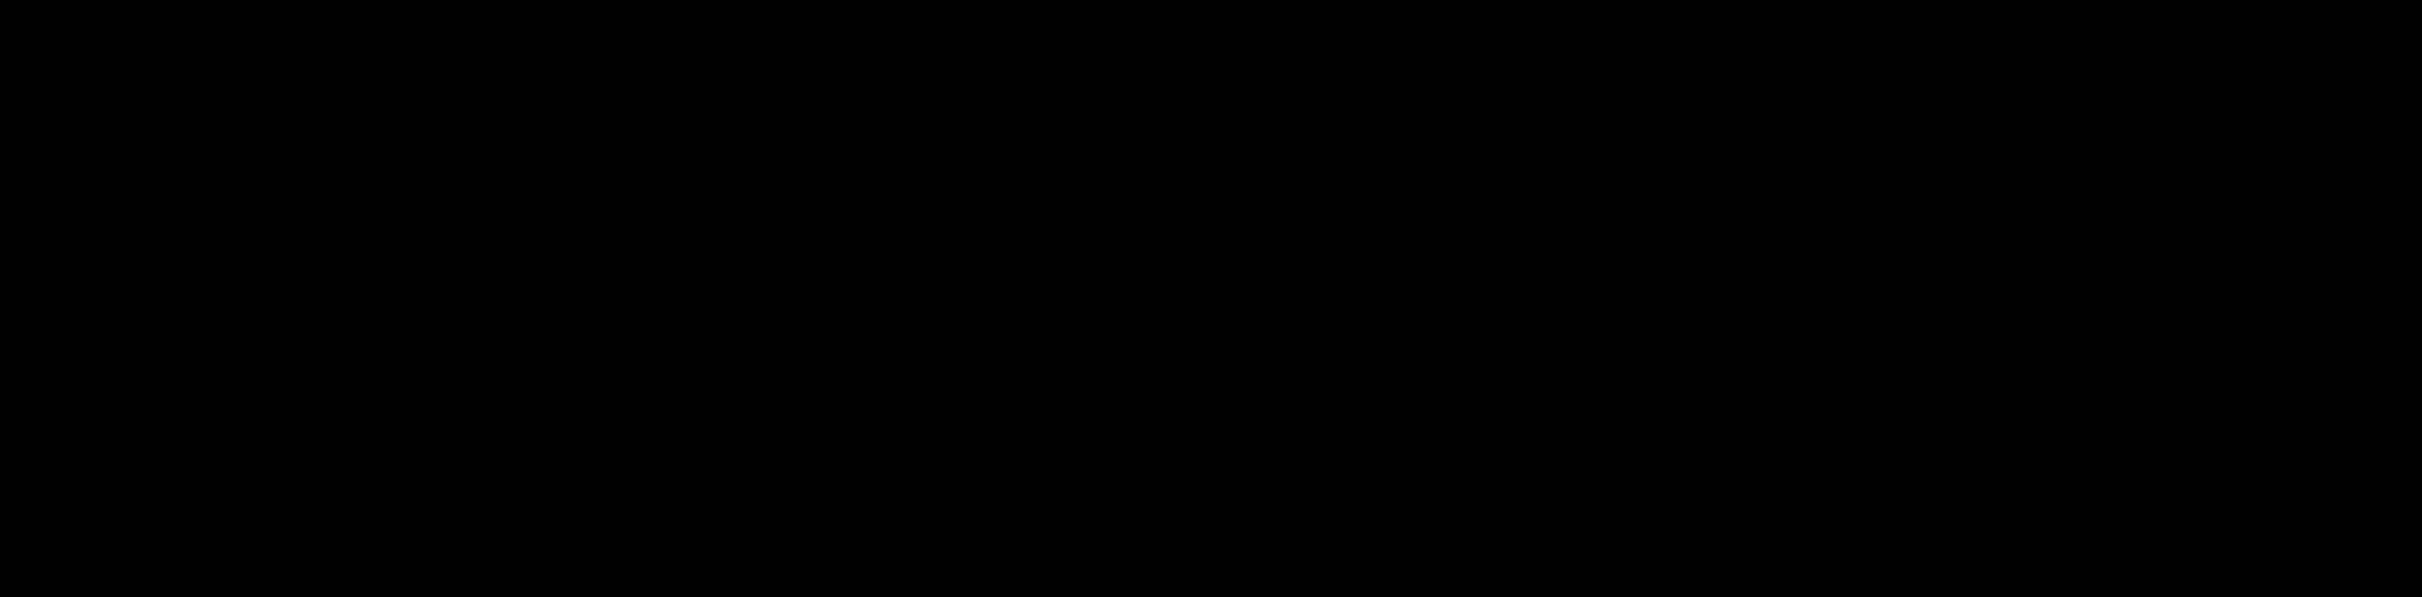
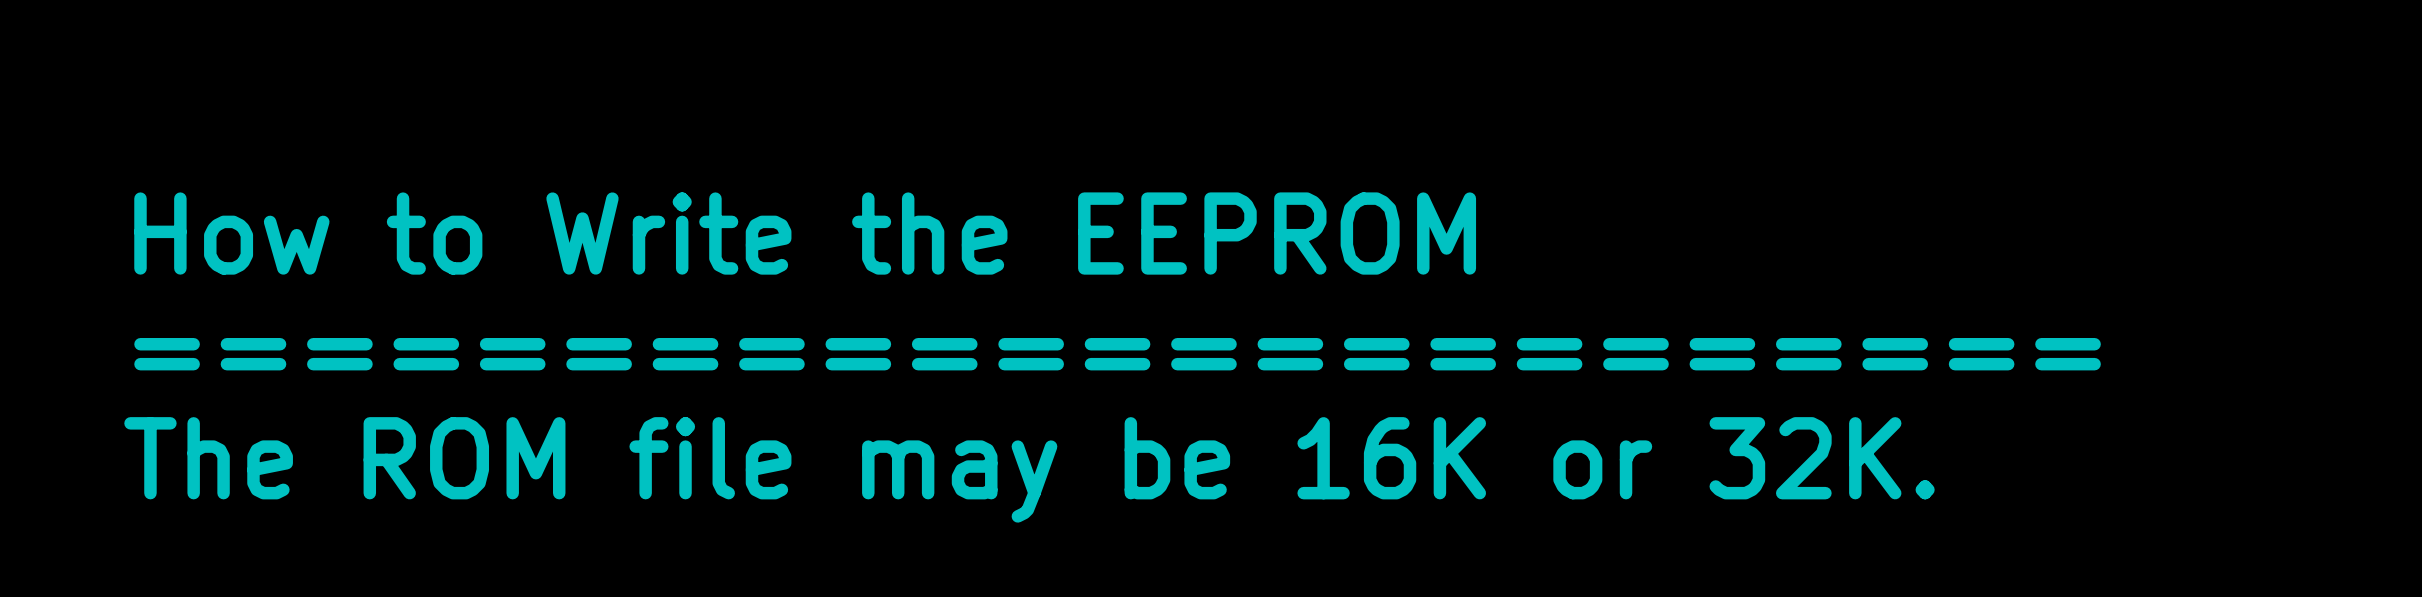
text: none -> How to Write the EEPROM (805, 233)
text: none -> ======================= (1117, 354)
text: none -> The ROM file may be 16K or 32K. (1029, 469)

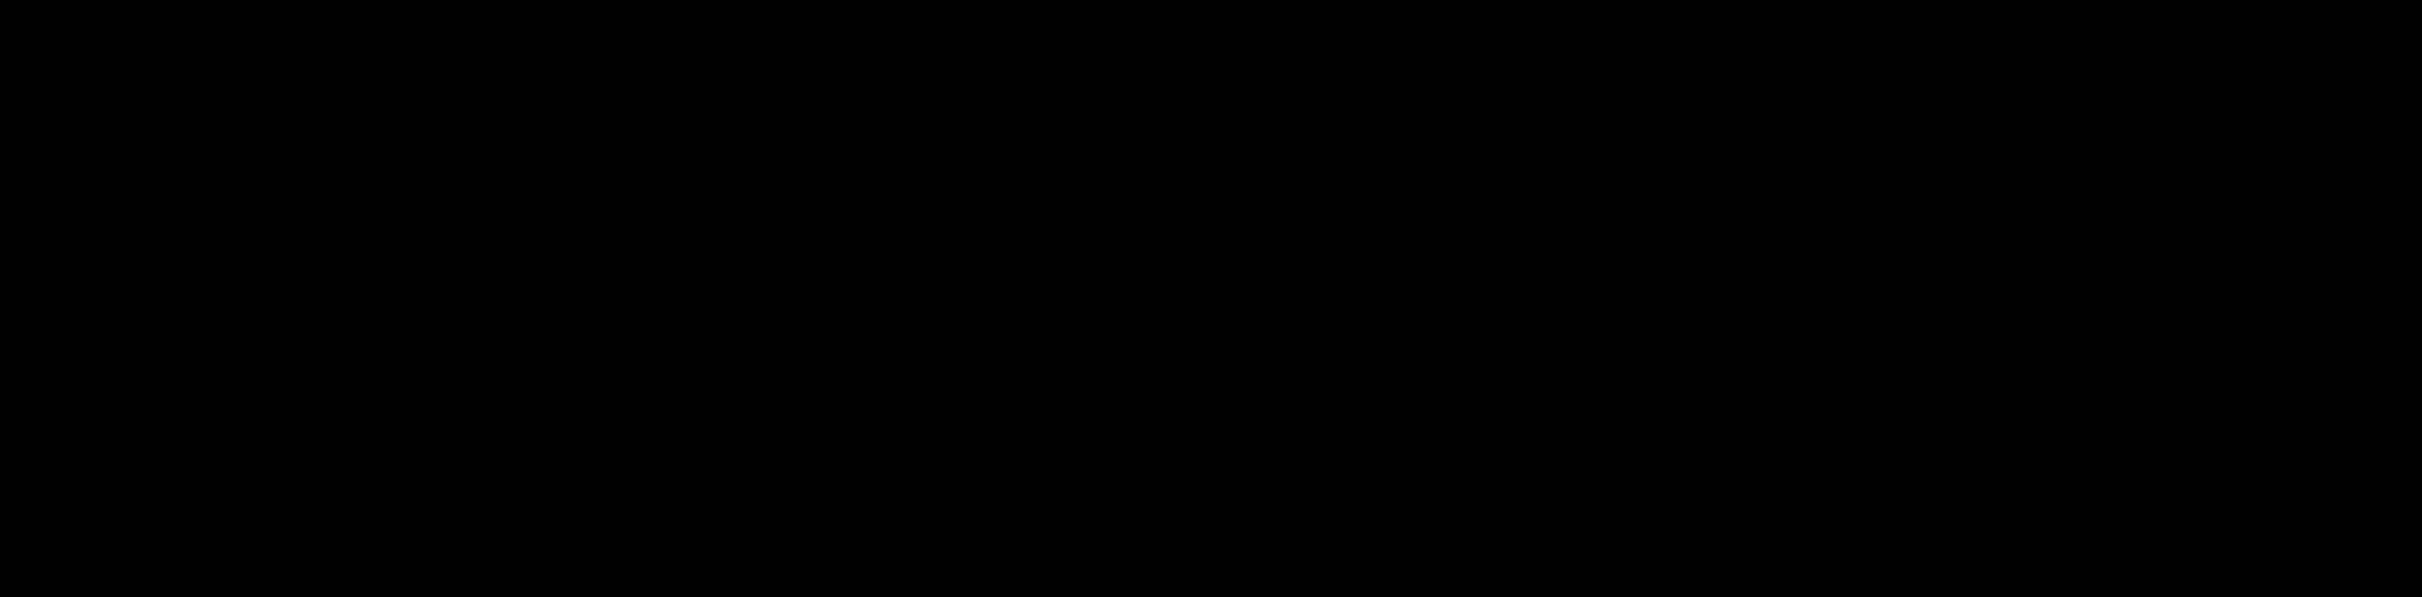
text: How to Write the EEPROM (805, 233) -> none
text: ======================= (1117, 354) -> none
text: The ROM file may be 16K or 32K. (1029, 469) -> none

